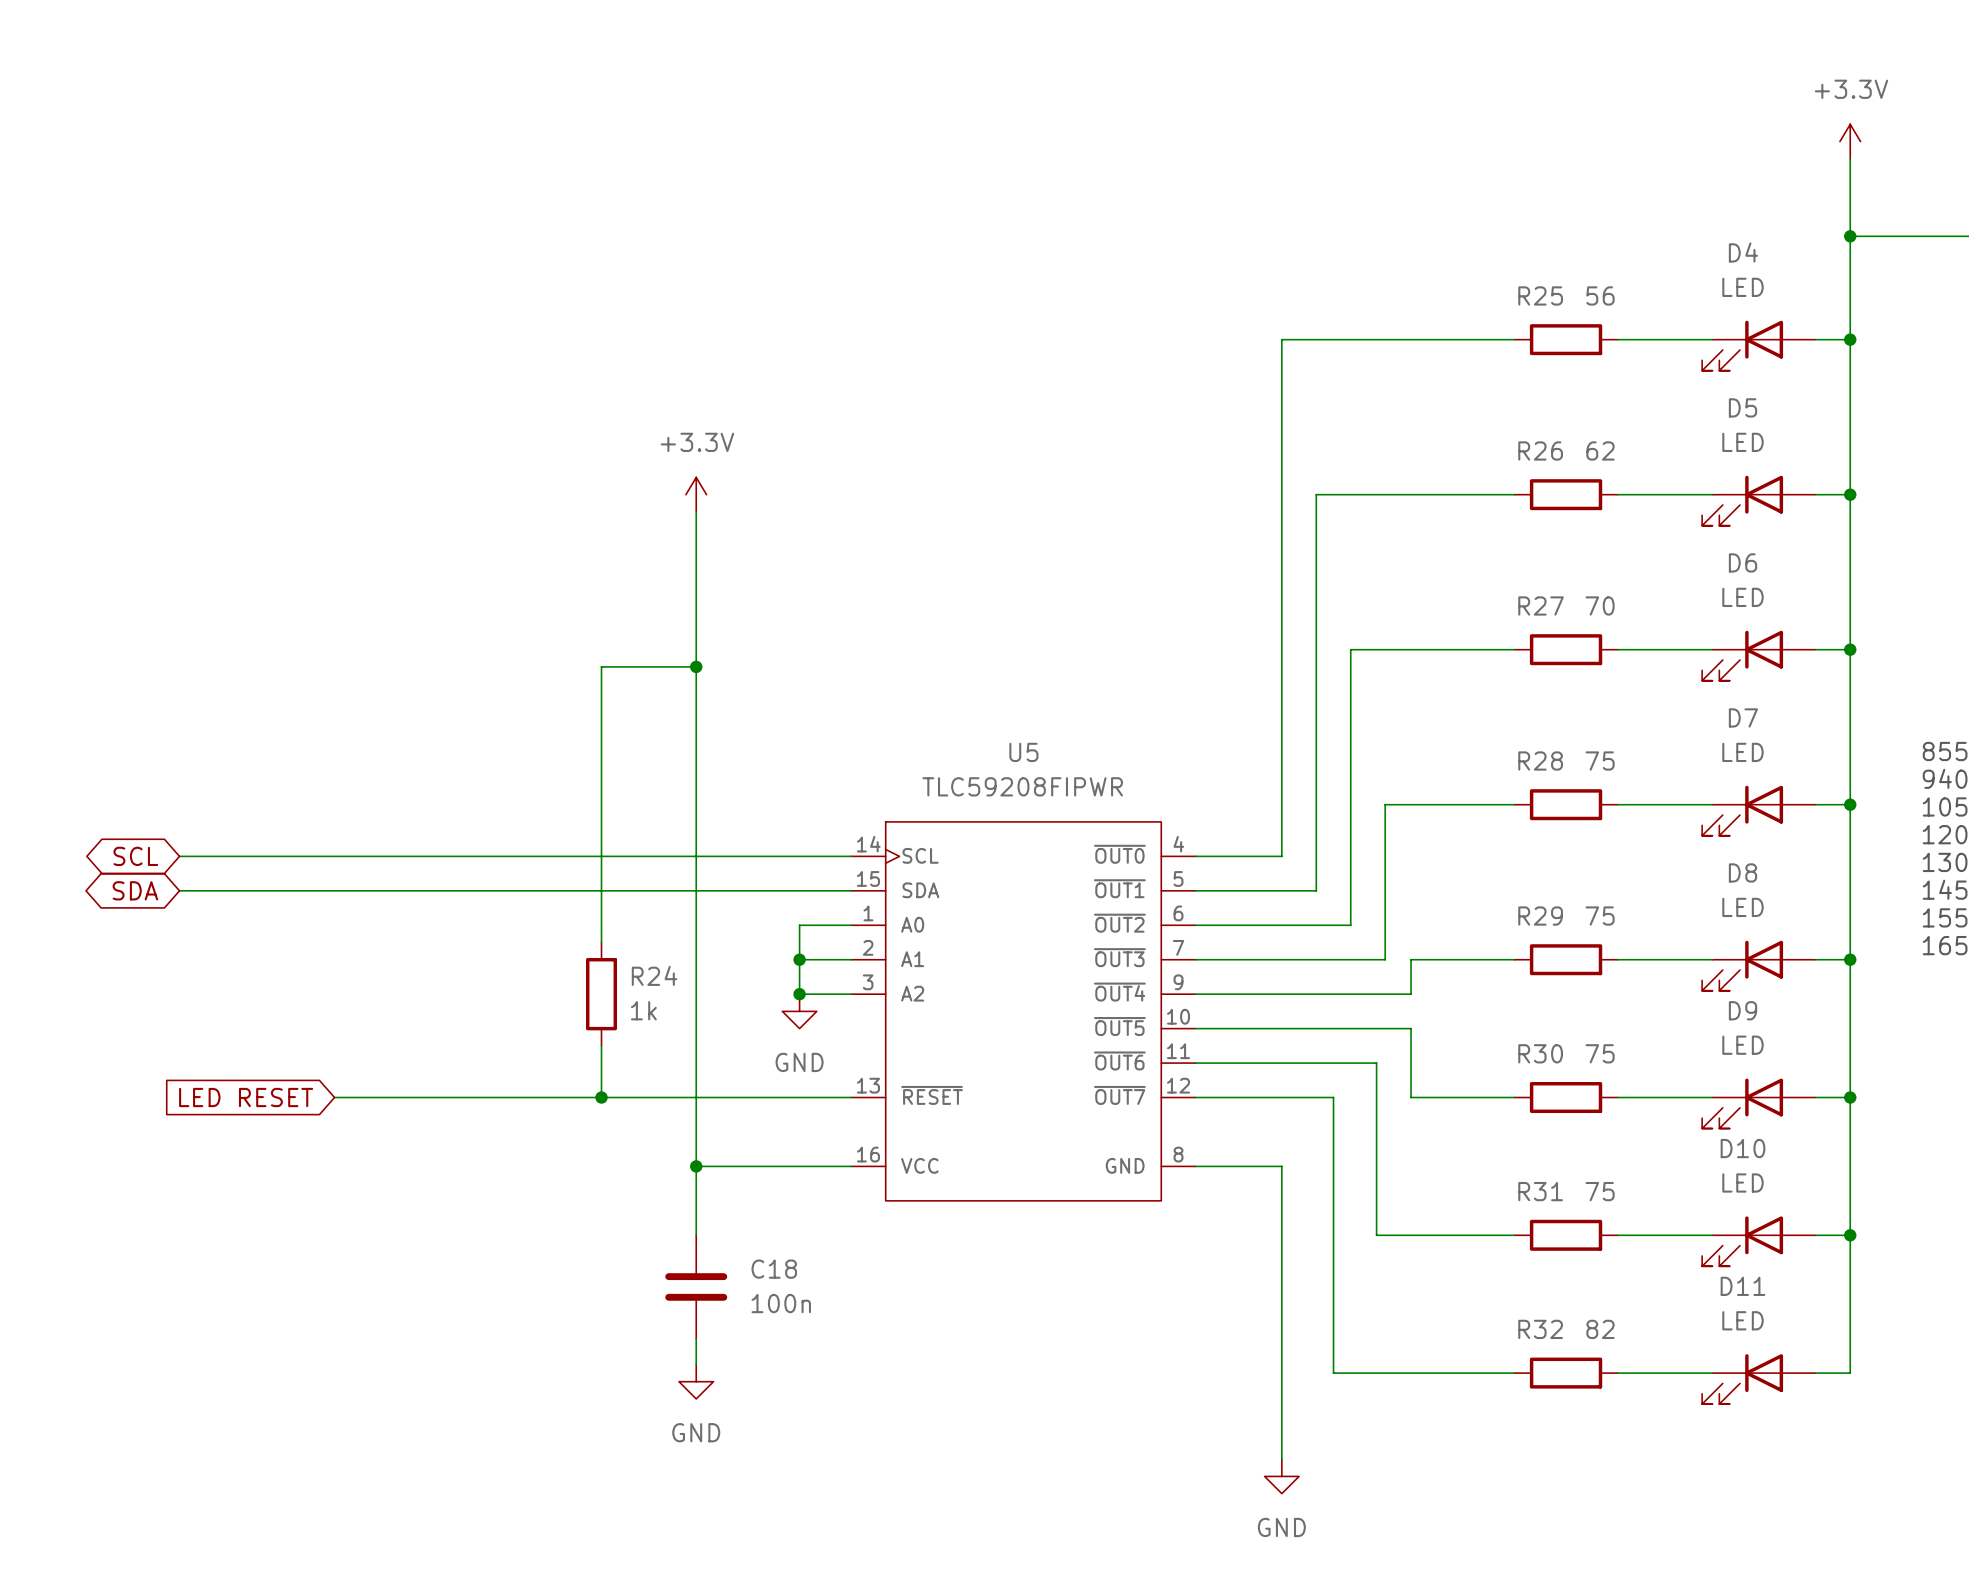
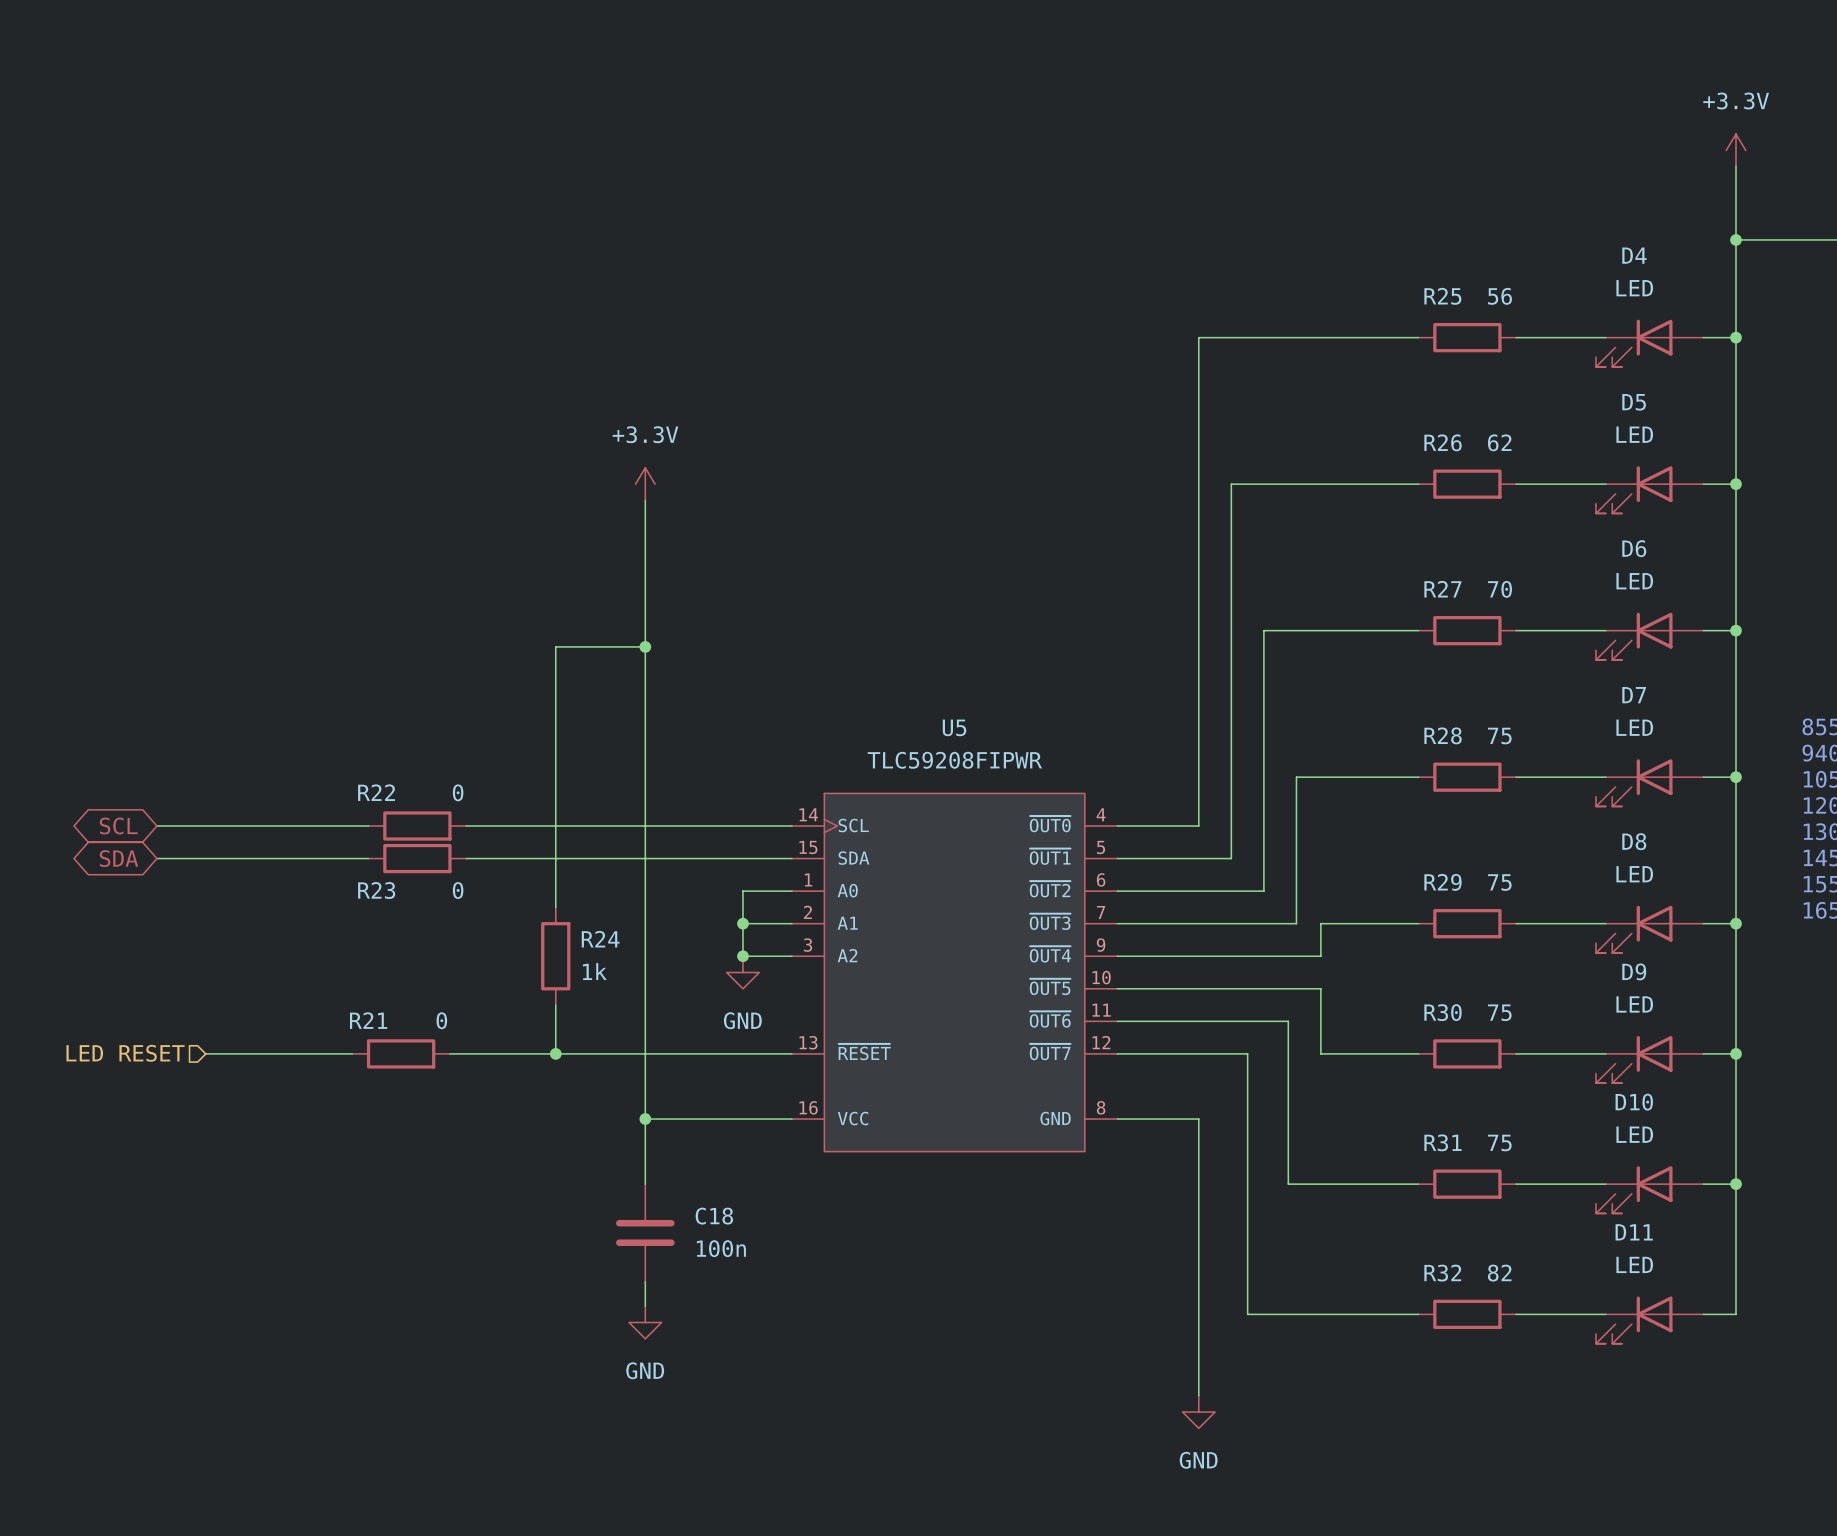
wire: (403, 856) (506, 856) -> none
R22: none -> 0 (417, 826)
wire: (403, 890) (506, 890) -> none
R23: none -> 0 (417, 858)
hierarchical label: none -> LED RESET (125, 1053)
global label: LED RESET (246, 1097) -> none
wire: (386, 1097) (489, 1097) -> (205, 1053) (303, 1053)
R21: none -> 0 (401, 1053)

